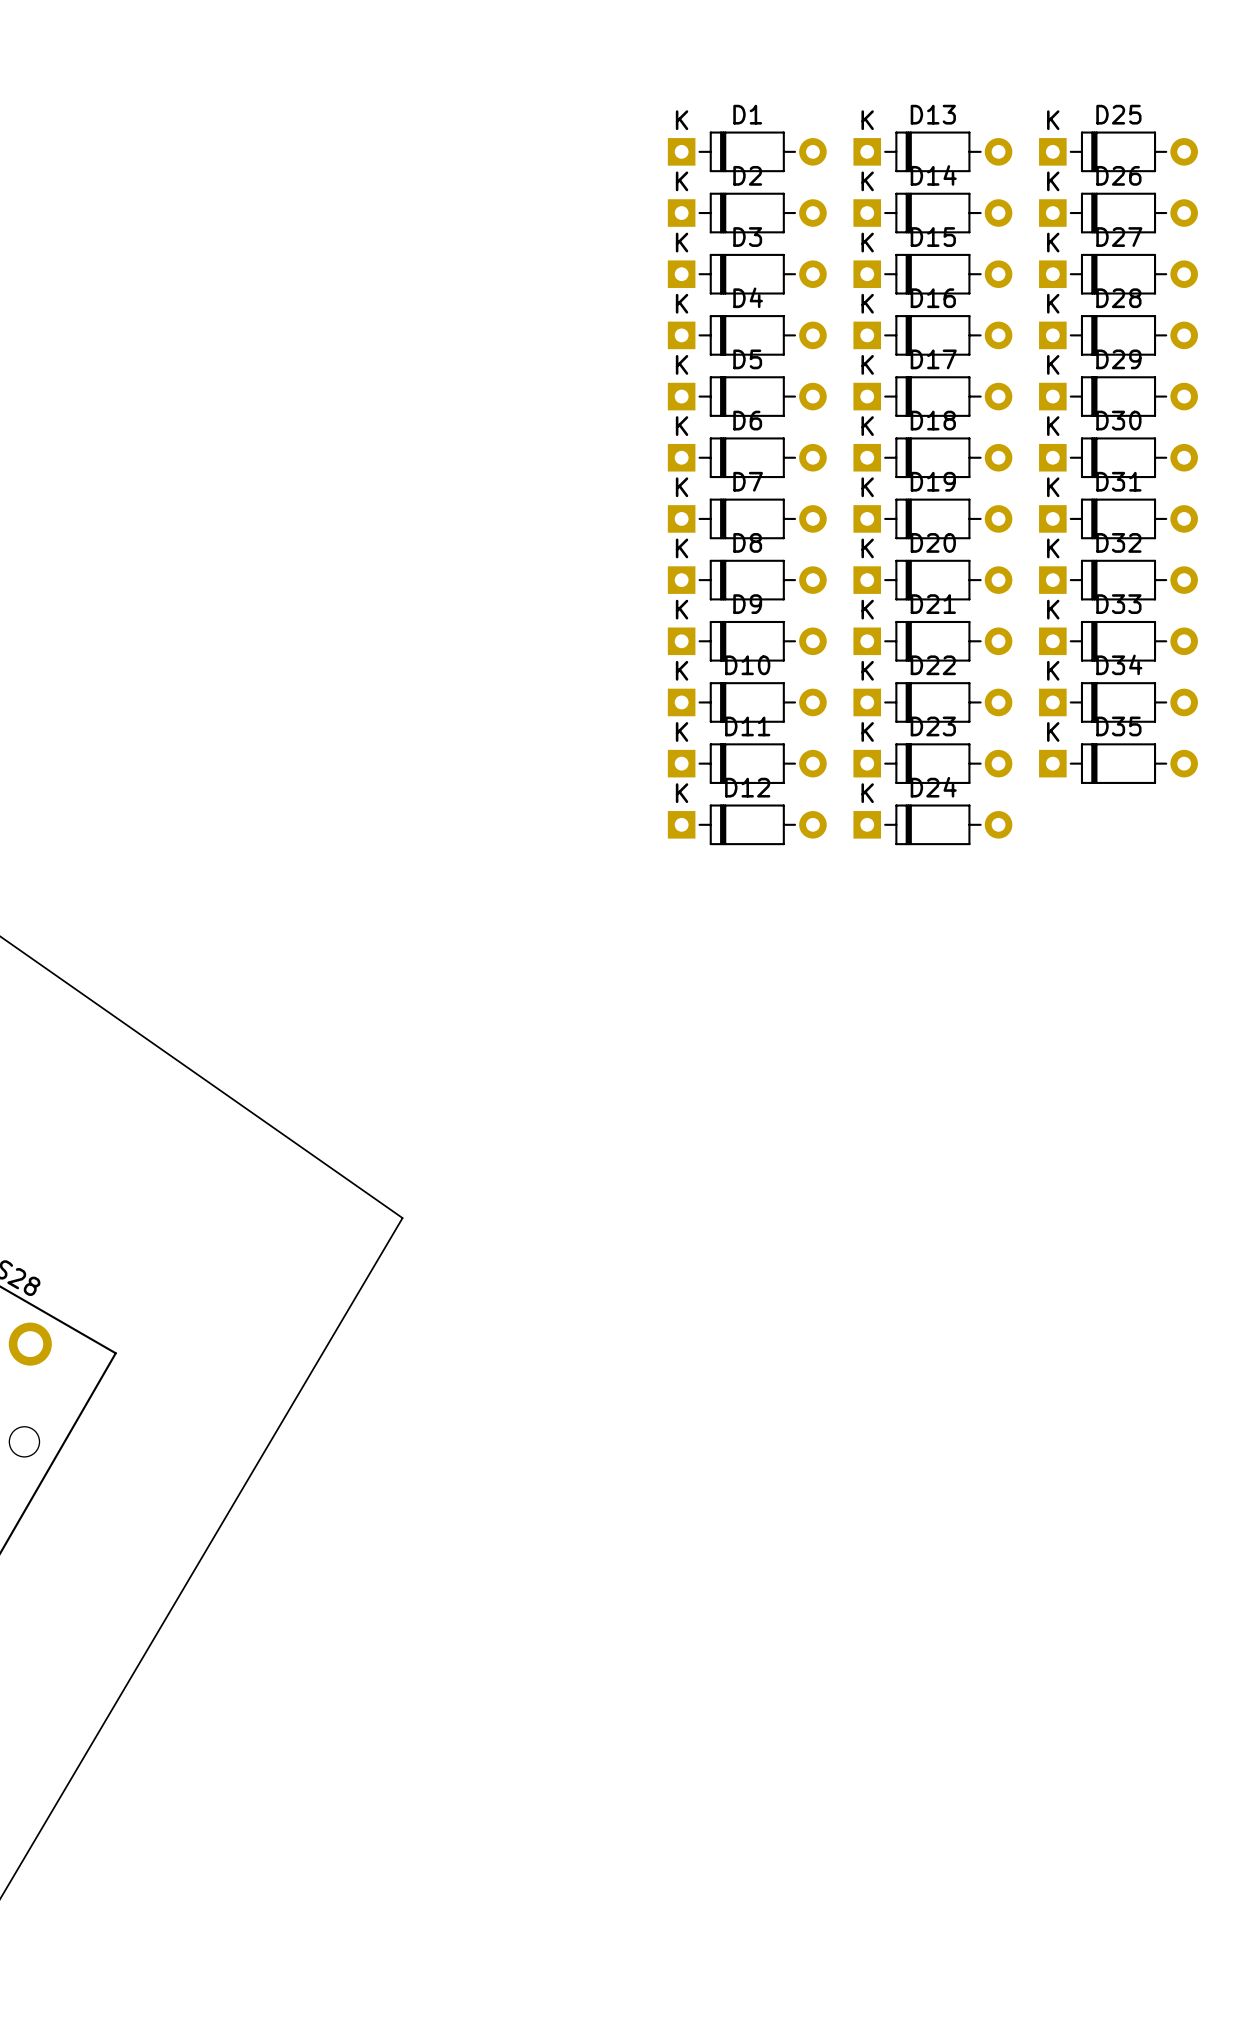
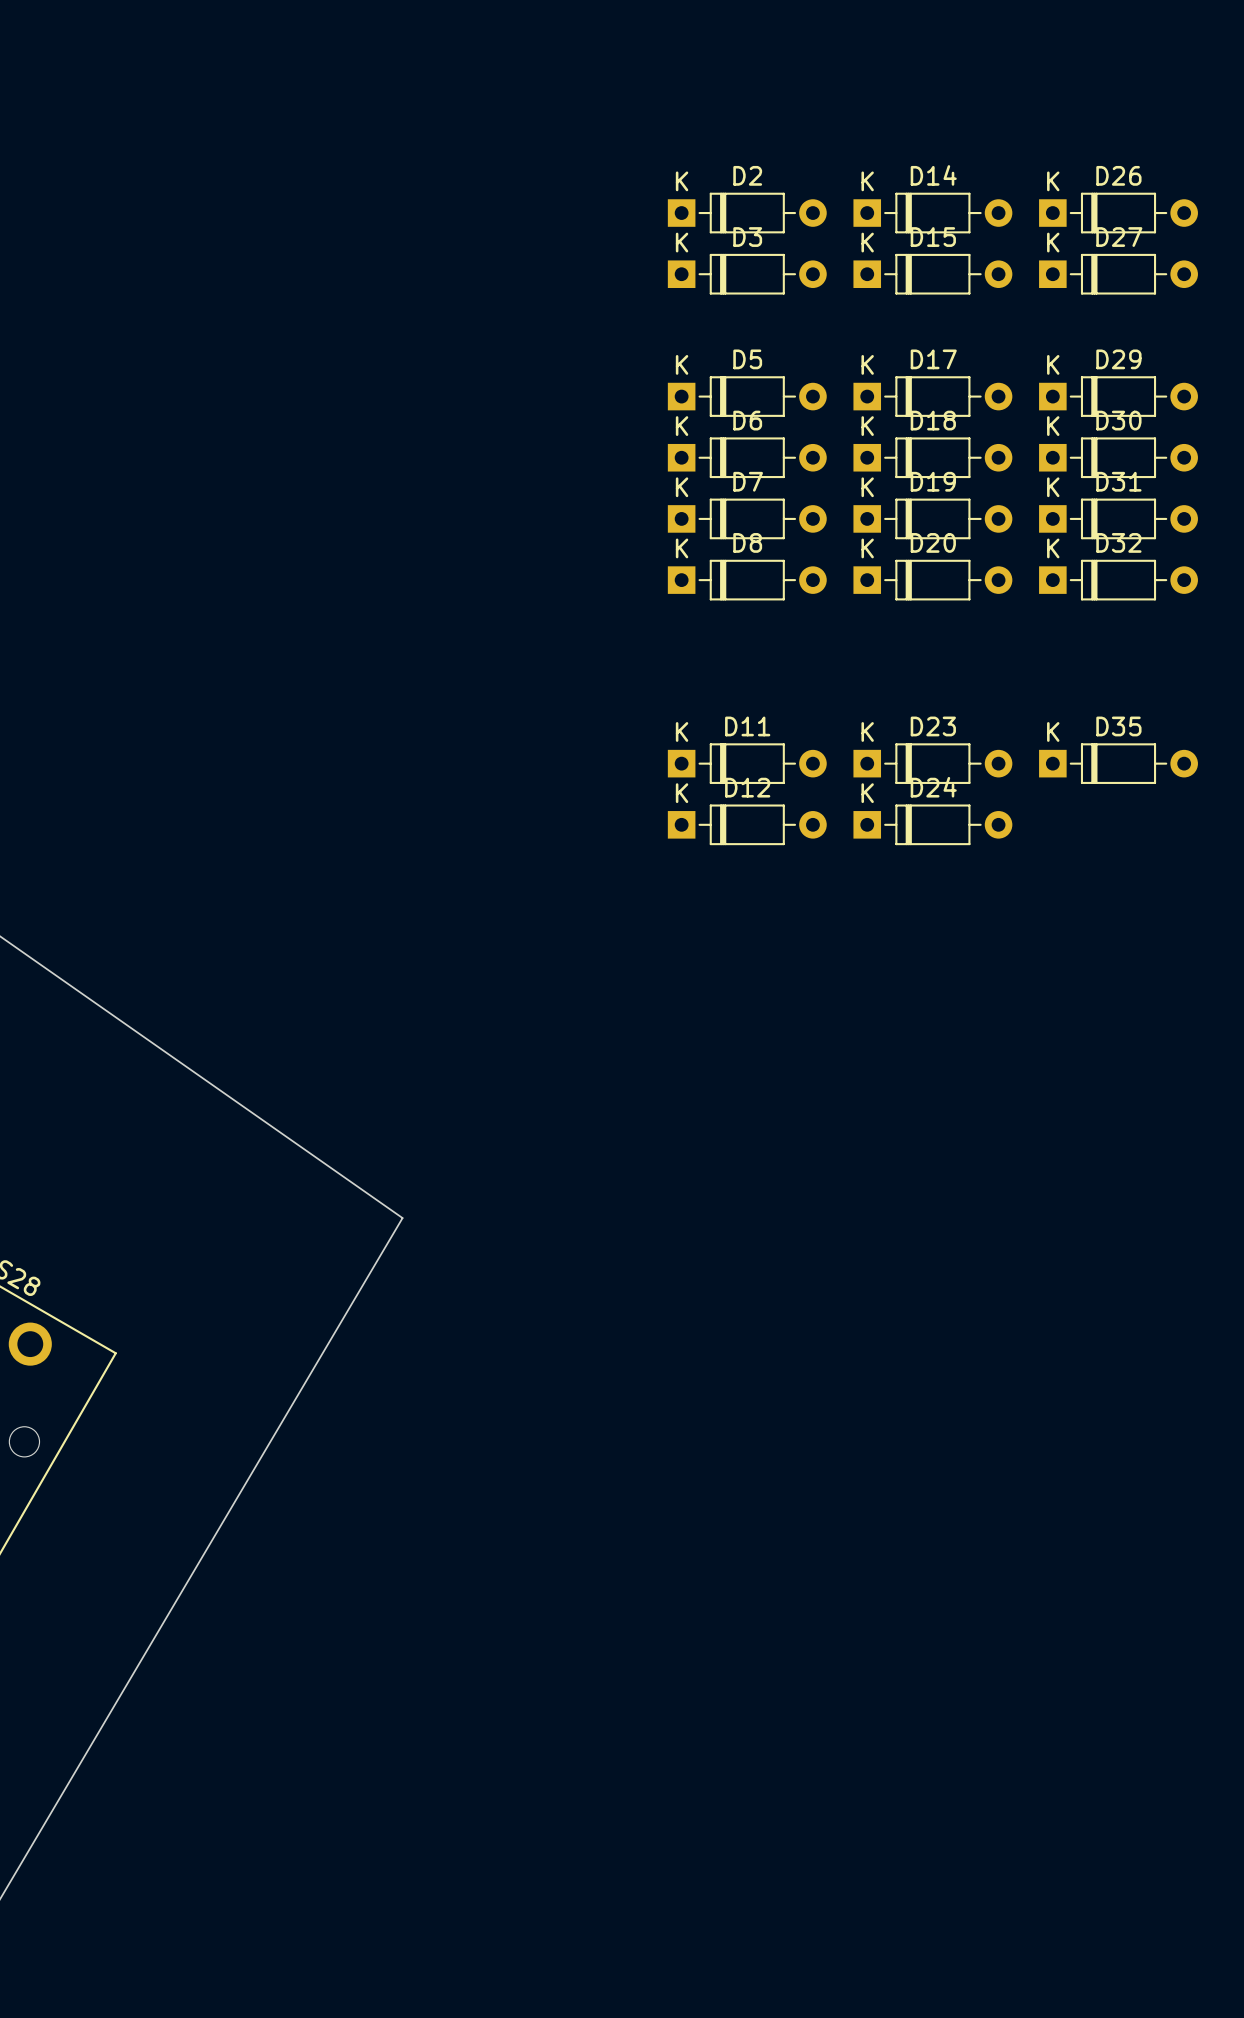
D1: (747, 151) -> none
D13: (932, 151) -> none
D25: (1118, 151) -> none
D4: (747, 335) -> none
D16: (932, 335) -> none
D28: (1118, 335) -> none
D9: (747, 641) -> none
D21: (932, 641) -> none
D33: (1118, 641) -> none
D10: (747, 702) -> none
D22: (932, 702) -> none
D34: (1118, 702) -> none

